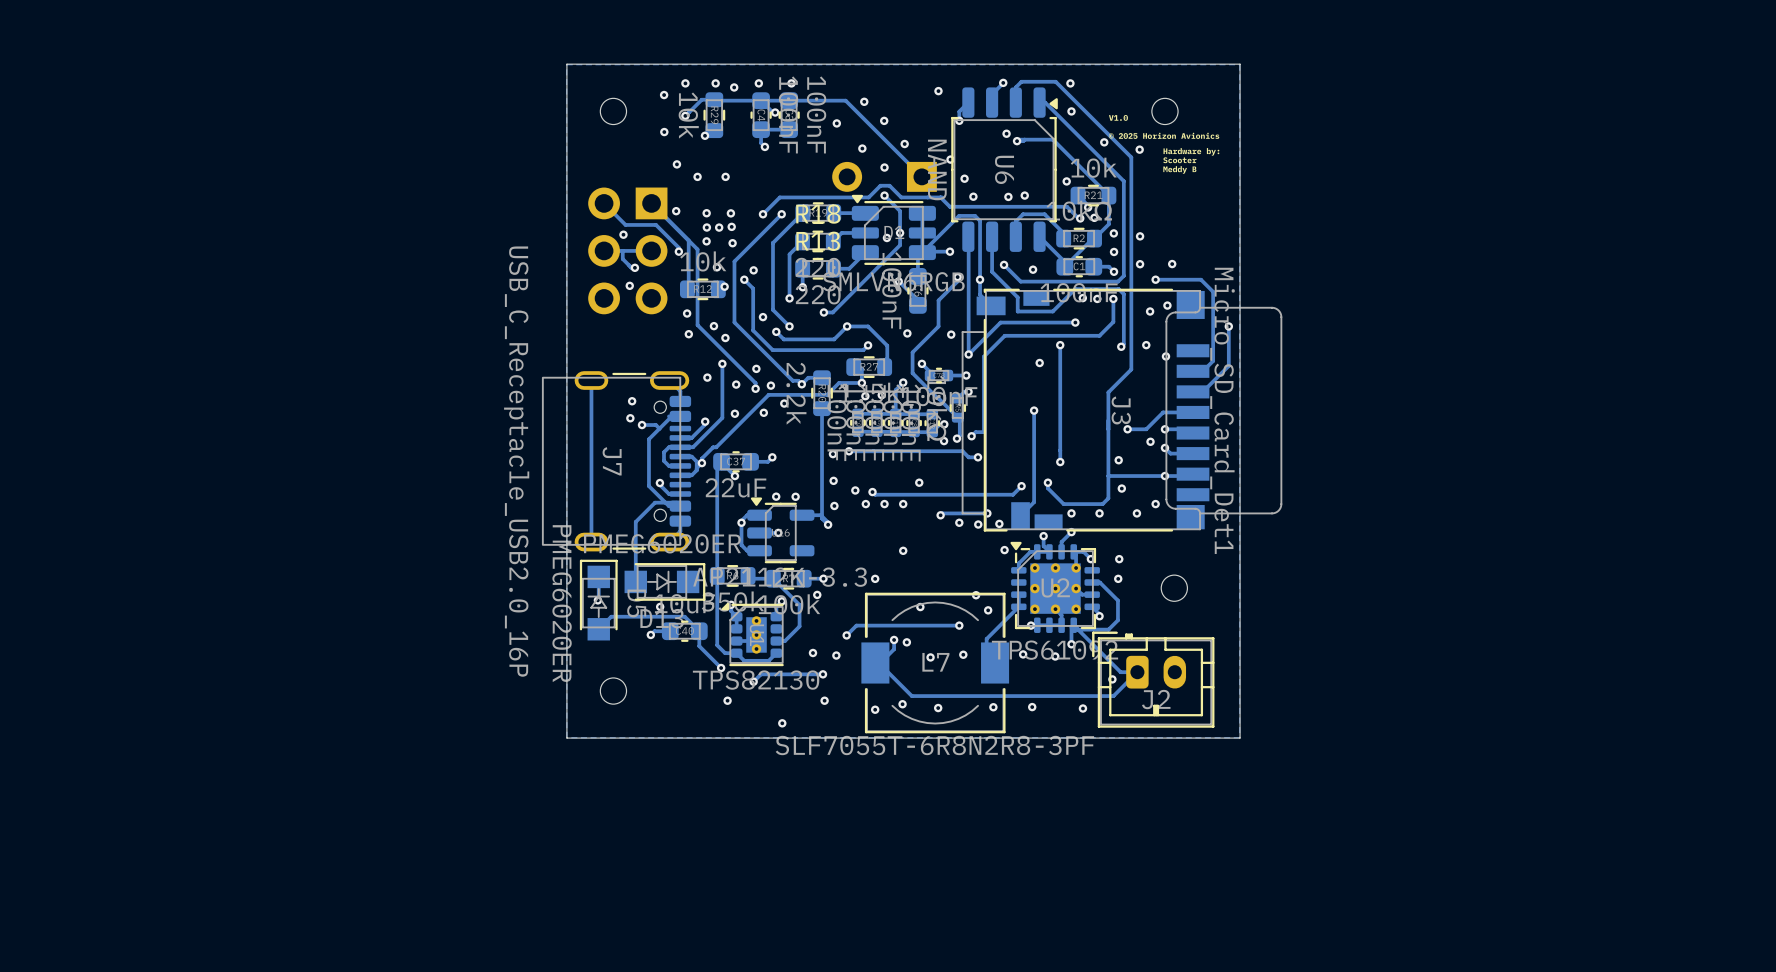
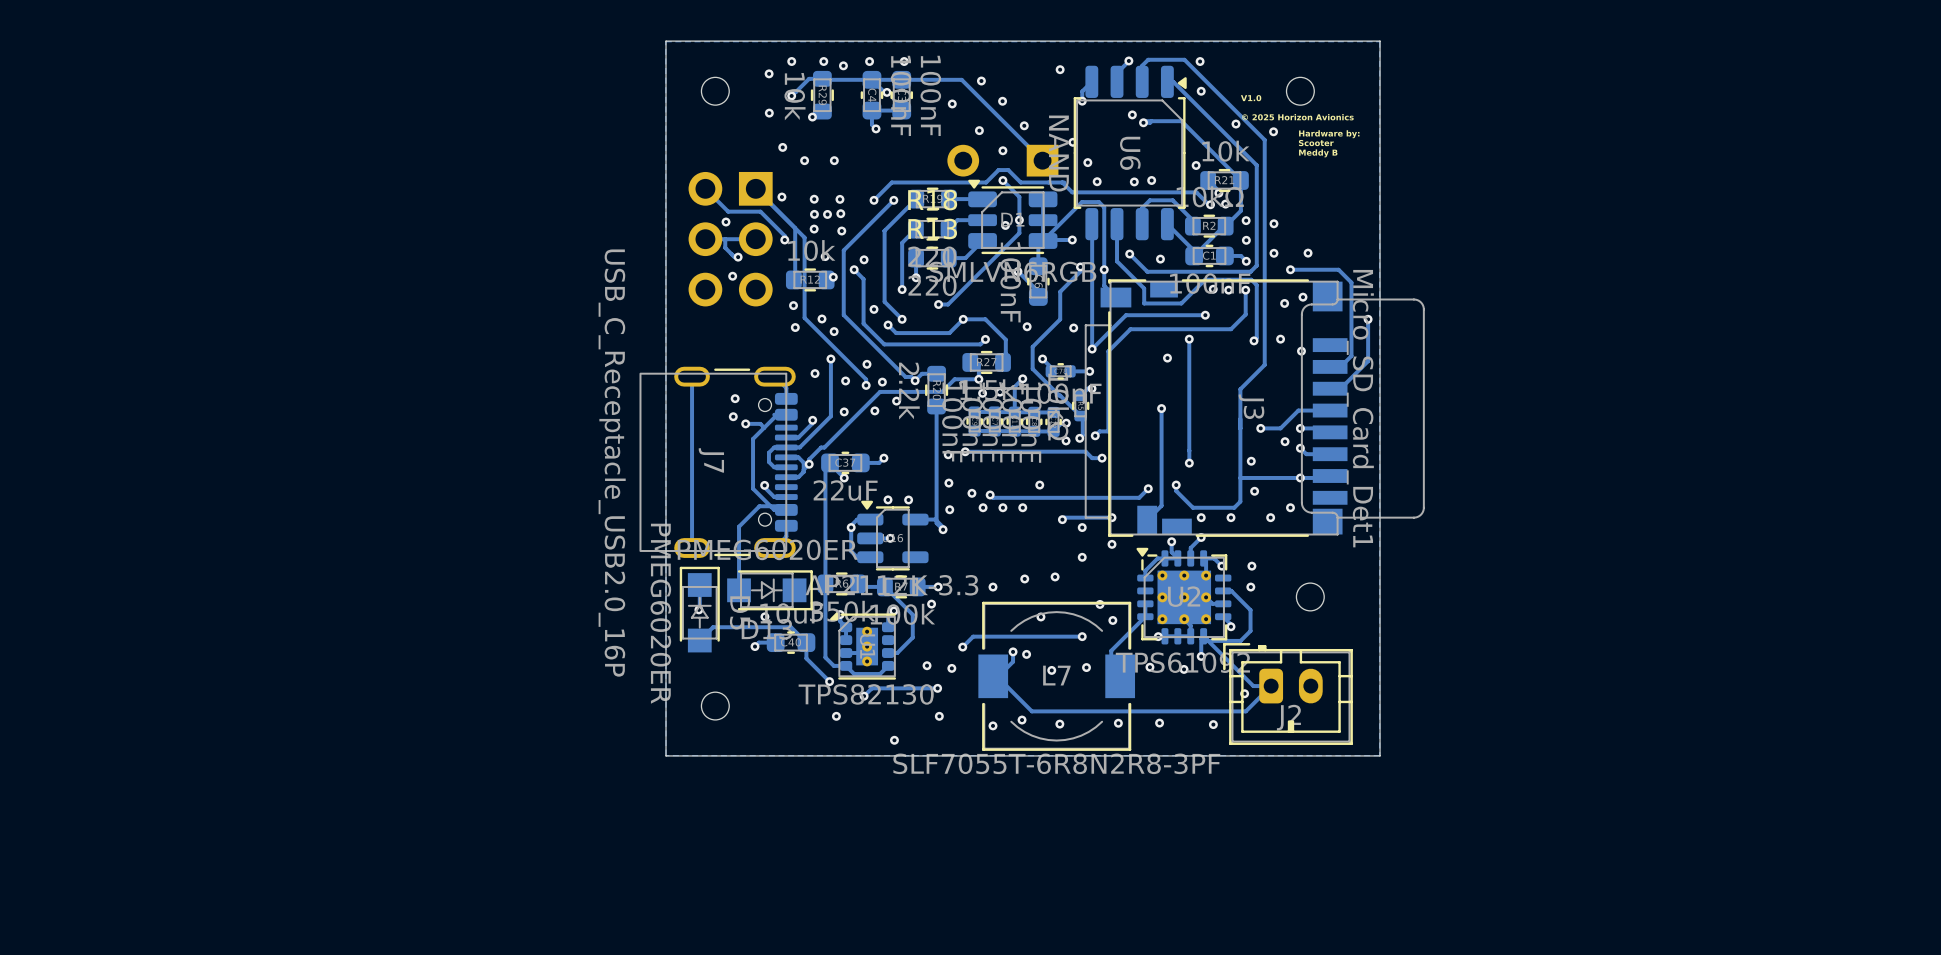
via: (999, 523) -> none
via: (978, 524) -> none
via: none -> (1112, 544)
via: (903, 550) -> none
via: none -> (1082, 557)
via: (1004, 550) -> none
via: none -> (1055, 576)
via: none -> (1024, 578)

